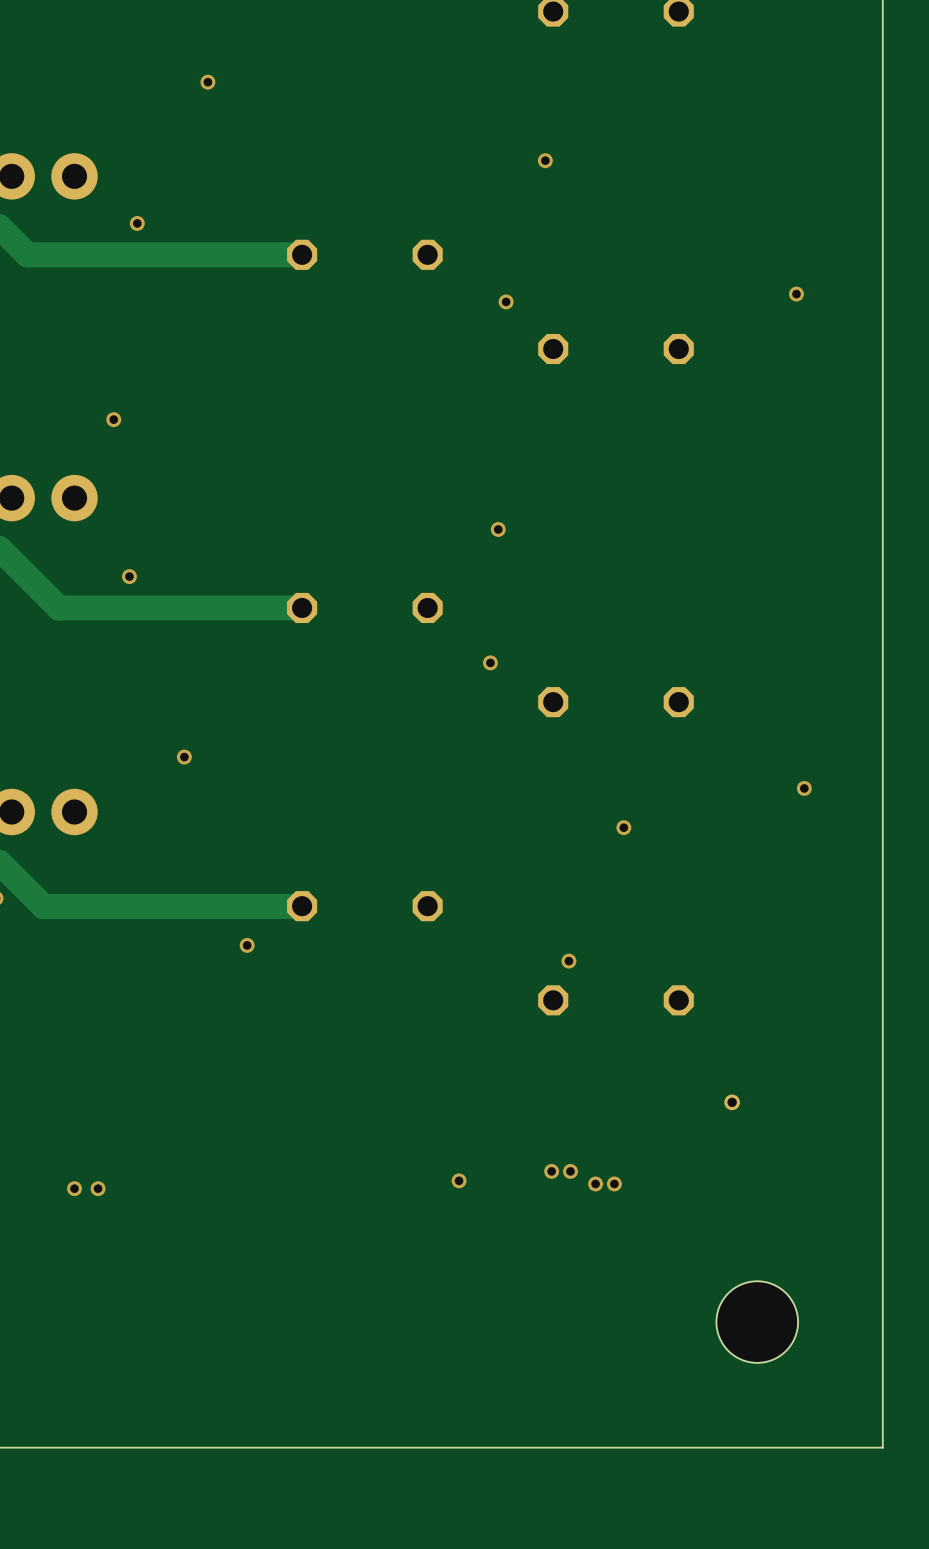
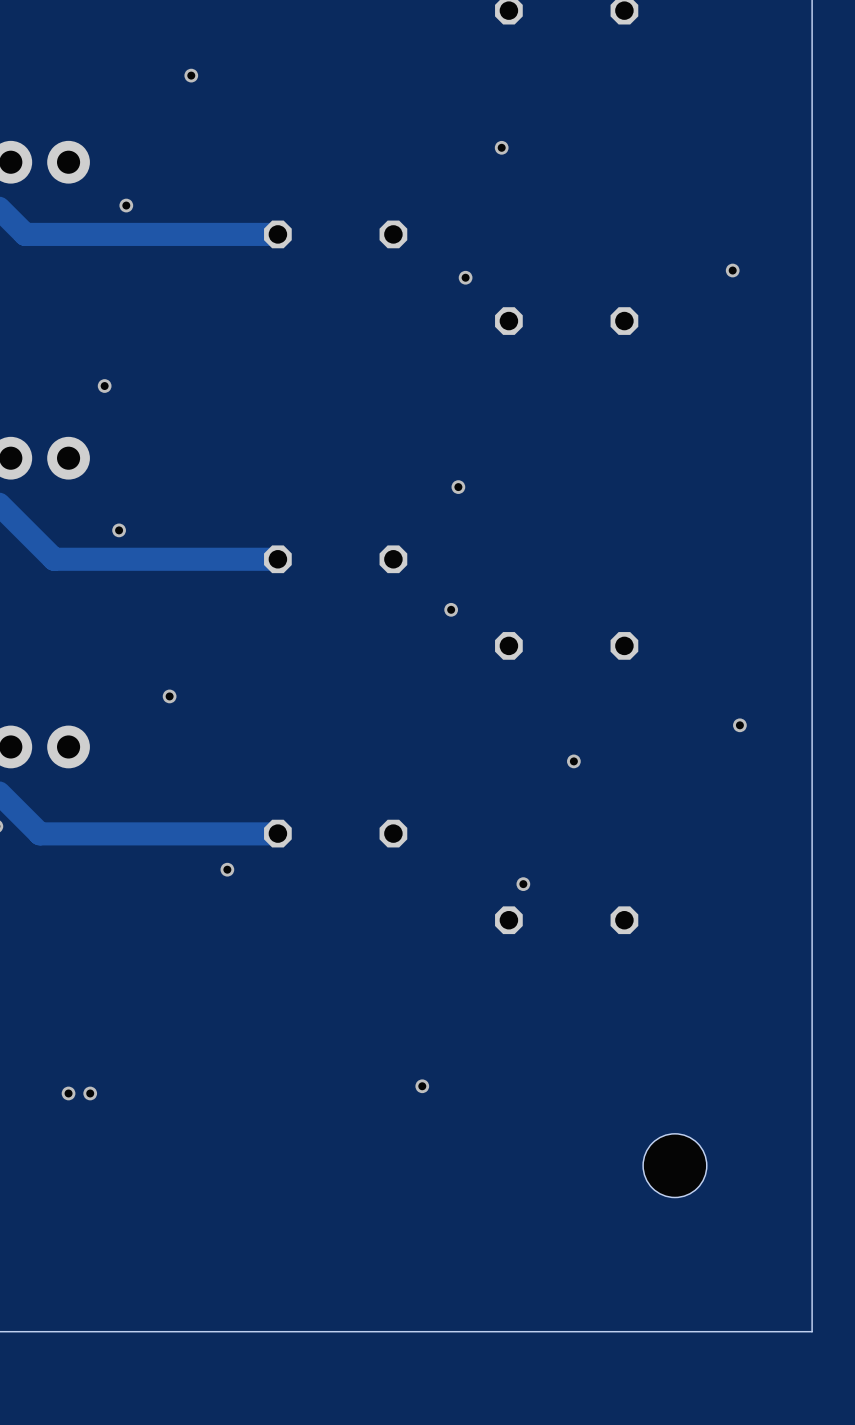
part: (732, 1102) -> none
via: (551, 1171) -> none
via: (570, 1171) -> none
via: (595, 1183) -> none
via: (614, 1183) -> none
part: none -> (674, 1165)
part: (757, 1322) -> none

